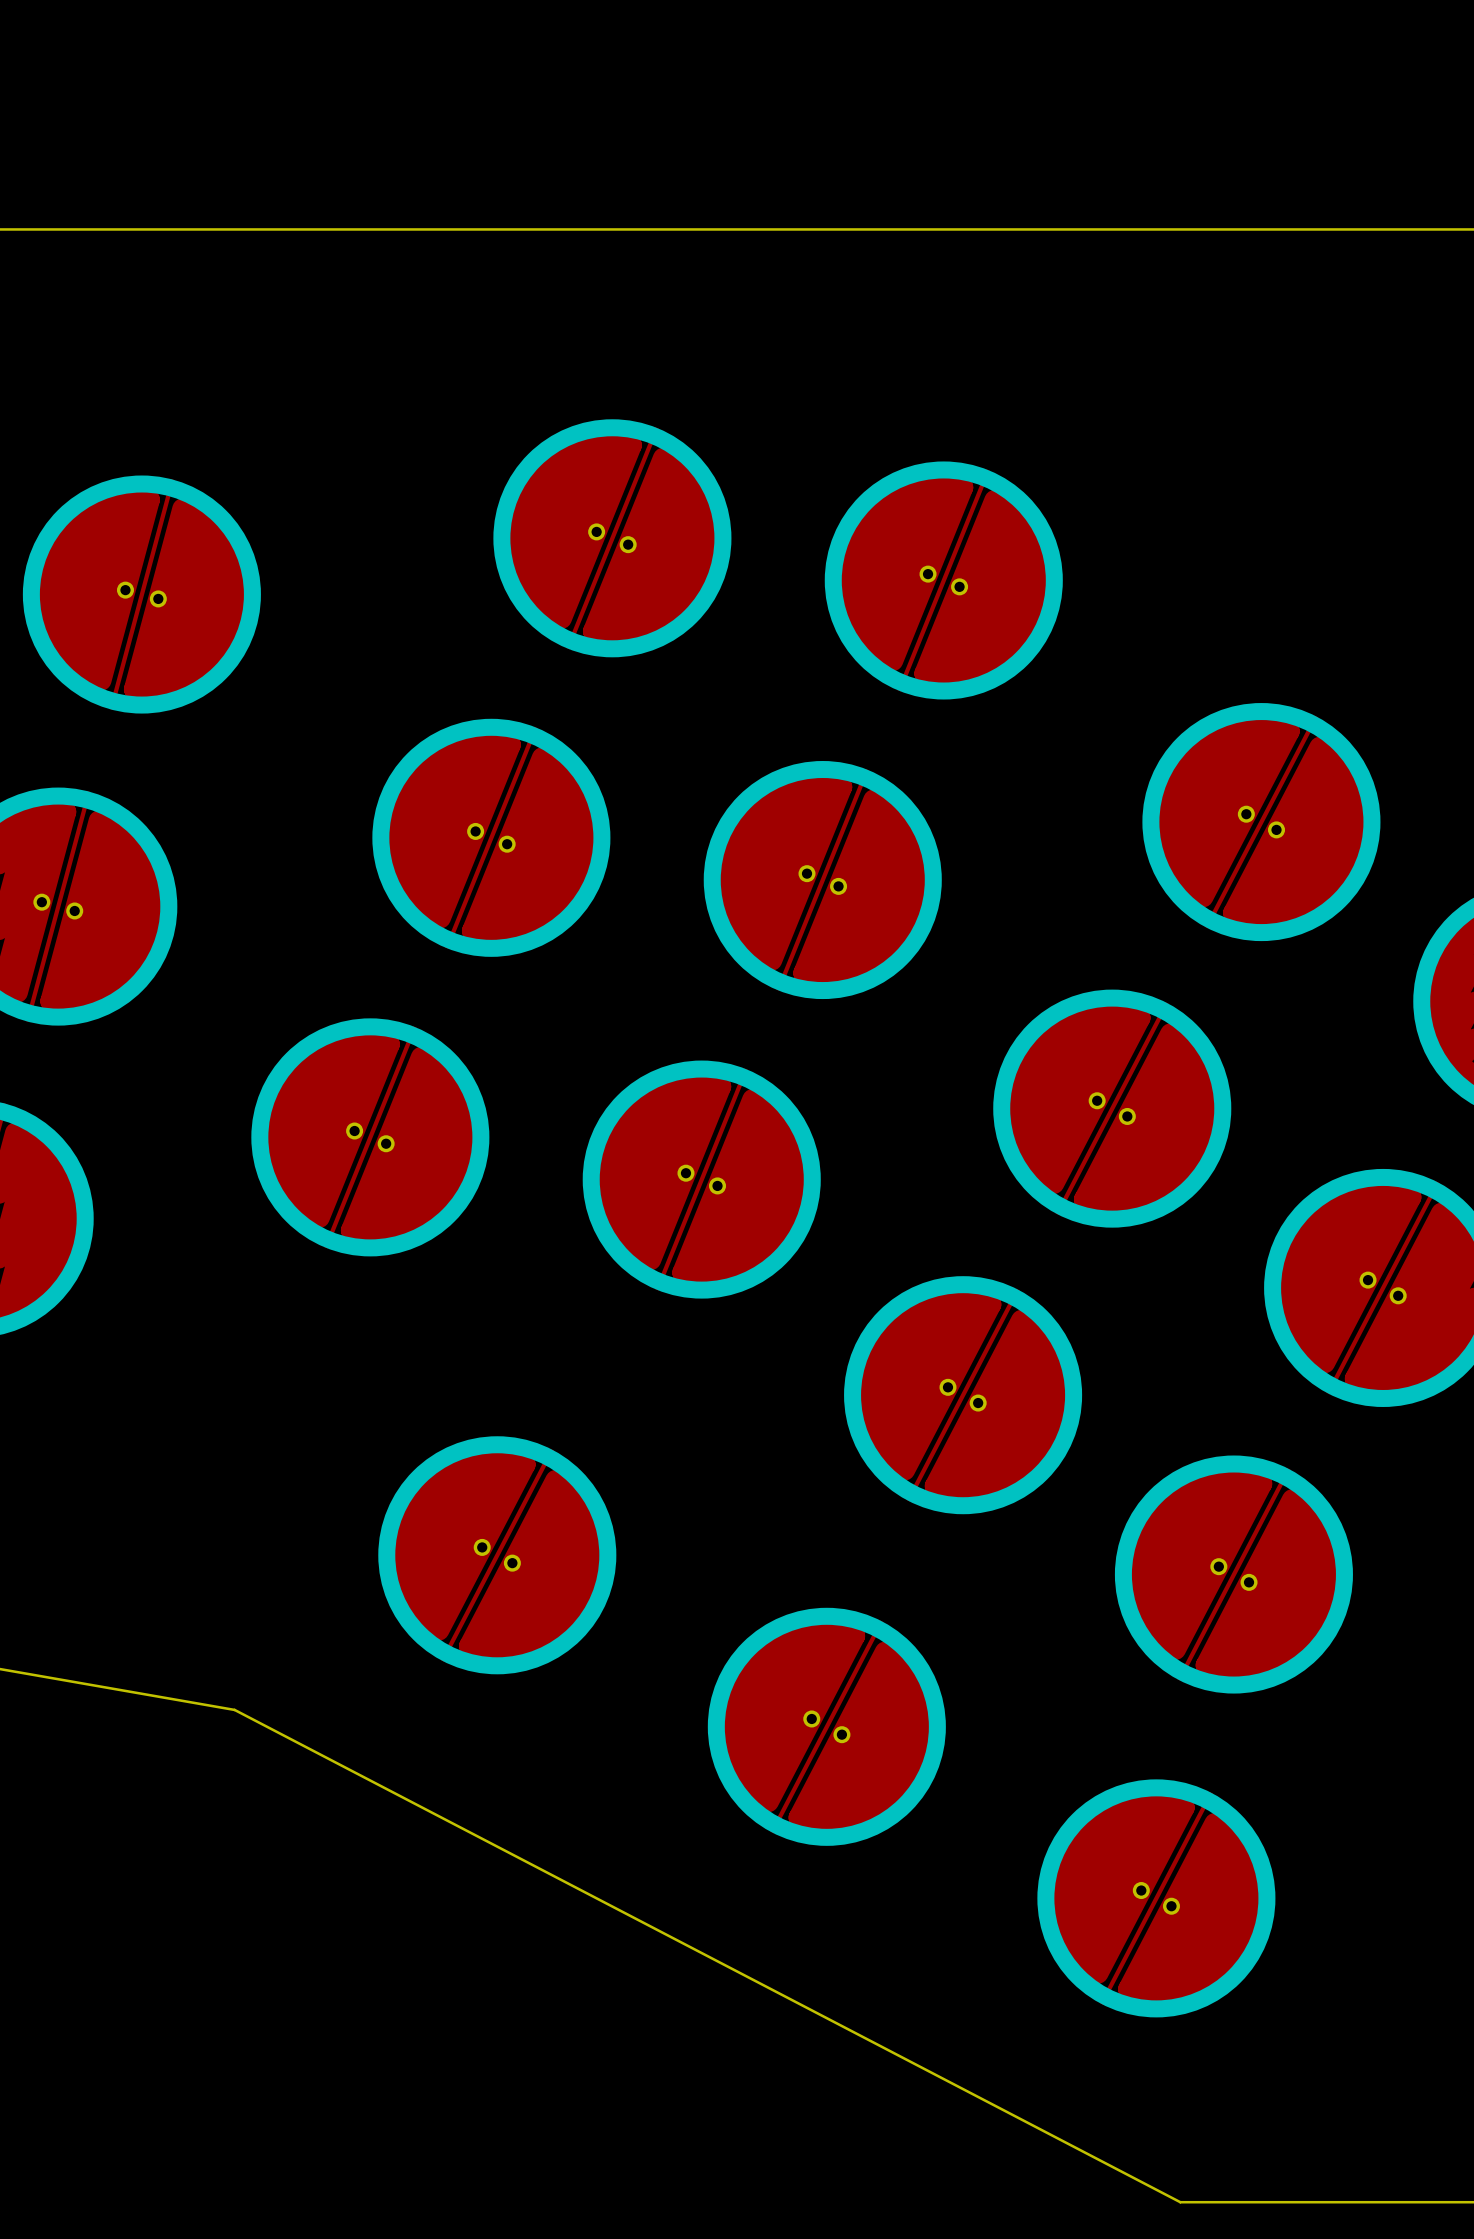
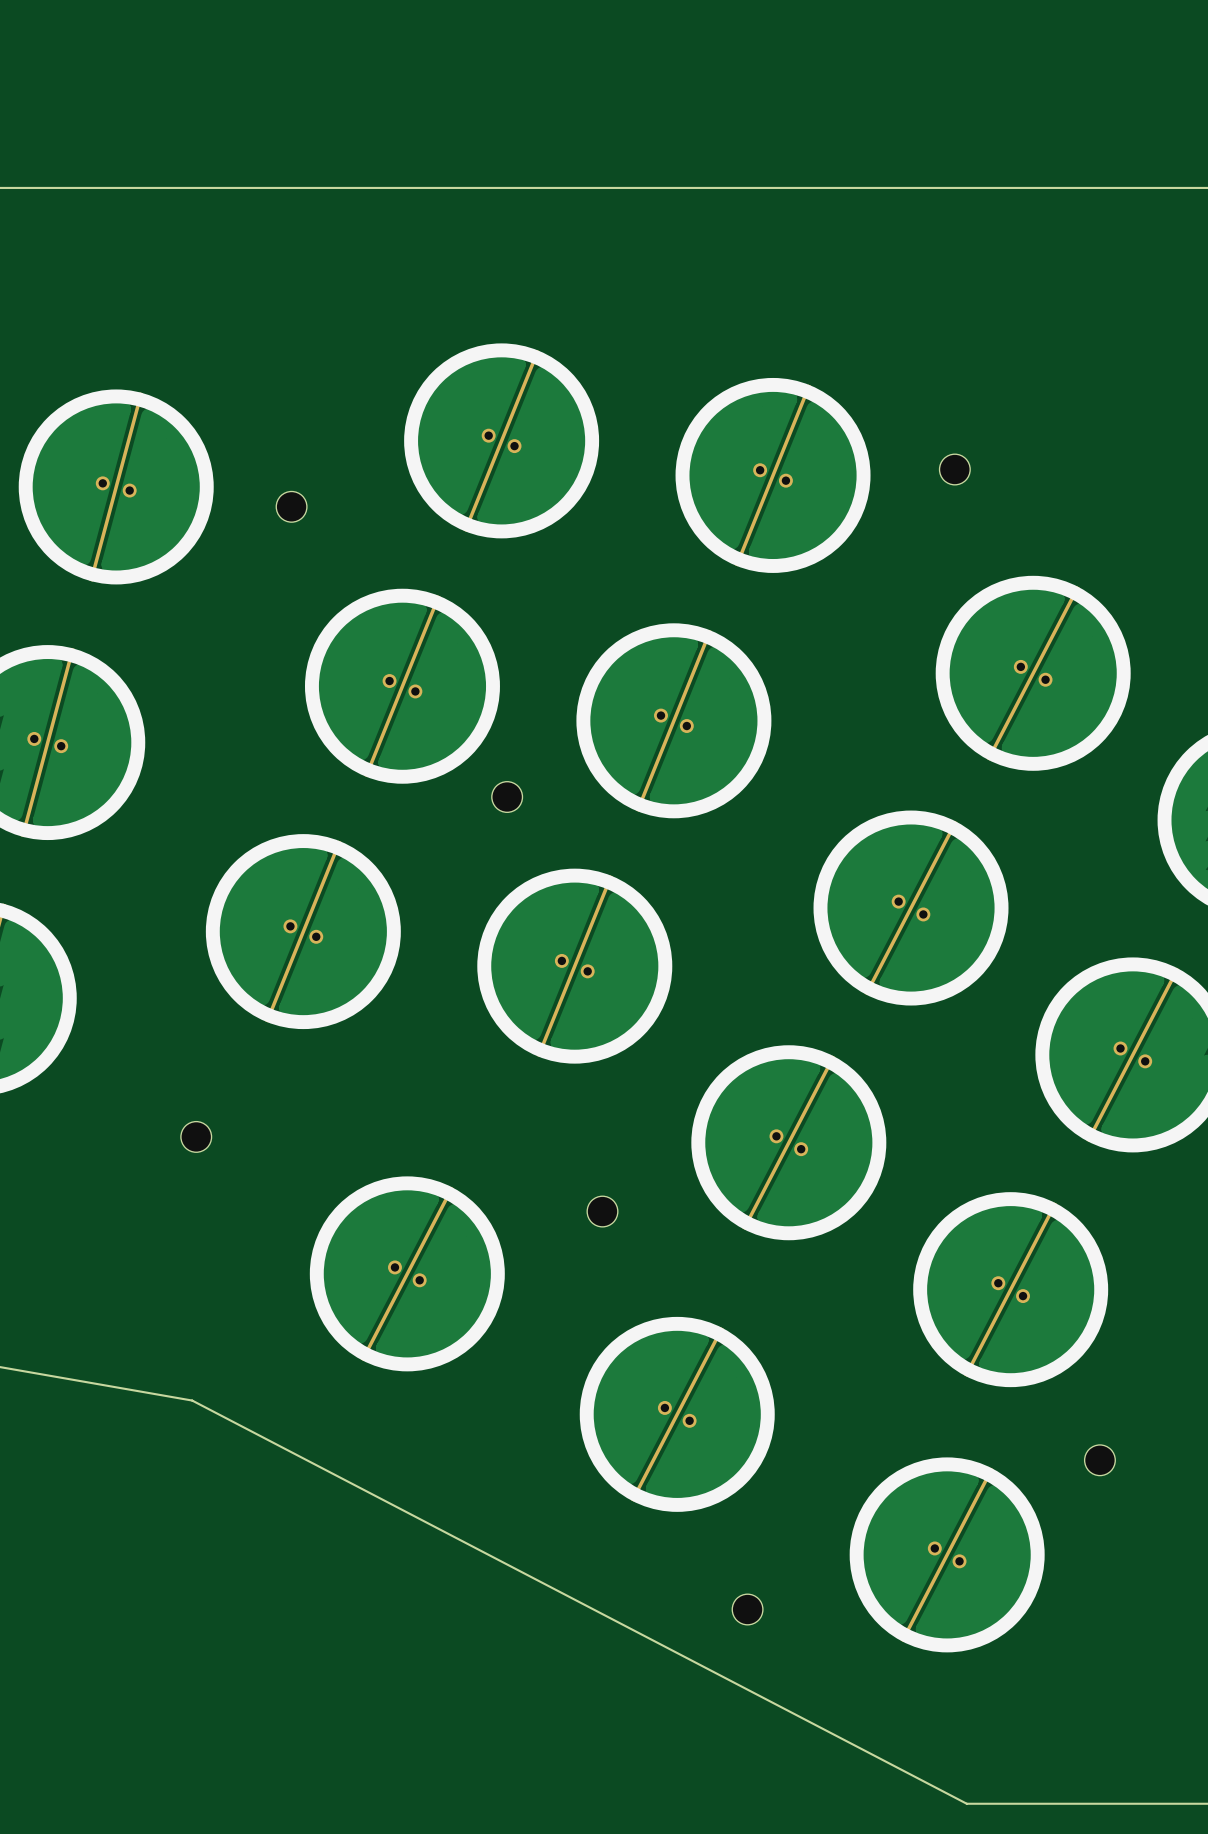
part: none -> (954, 469)
part: none -> (291, 506)
part: none -> (507, 797)
part: none -> (196, 1136)
part: none -> (602, 1211)
part: none -> (1099, 1460)
part: none -> (747, 1609)

